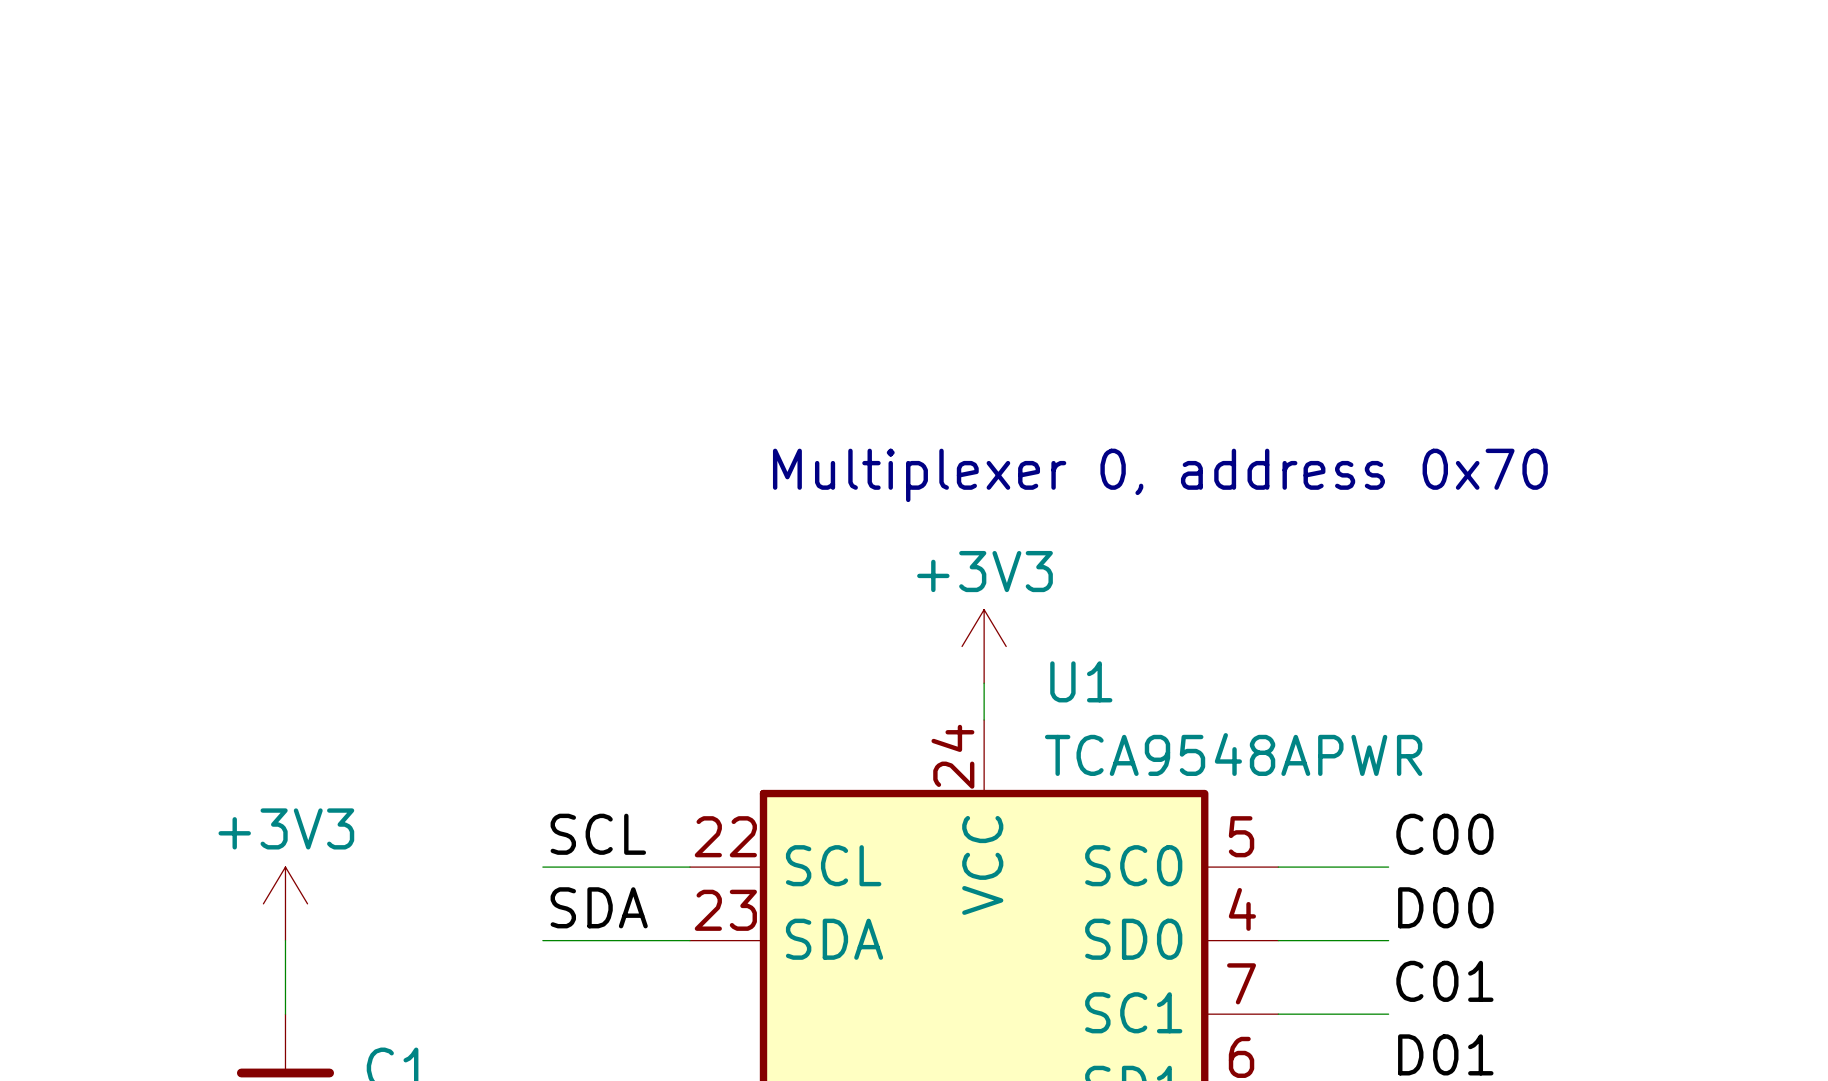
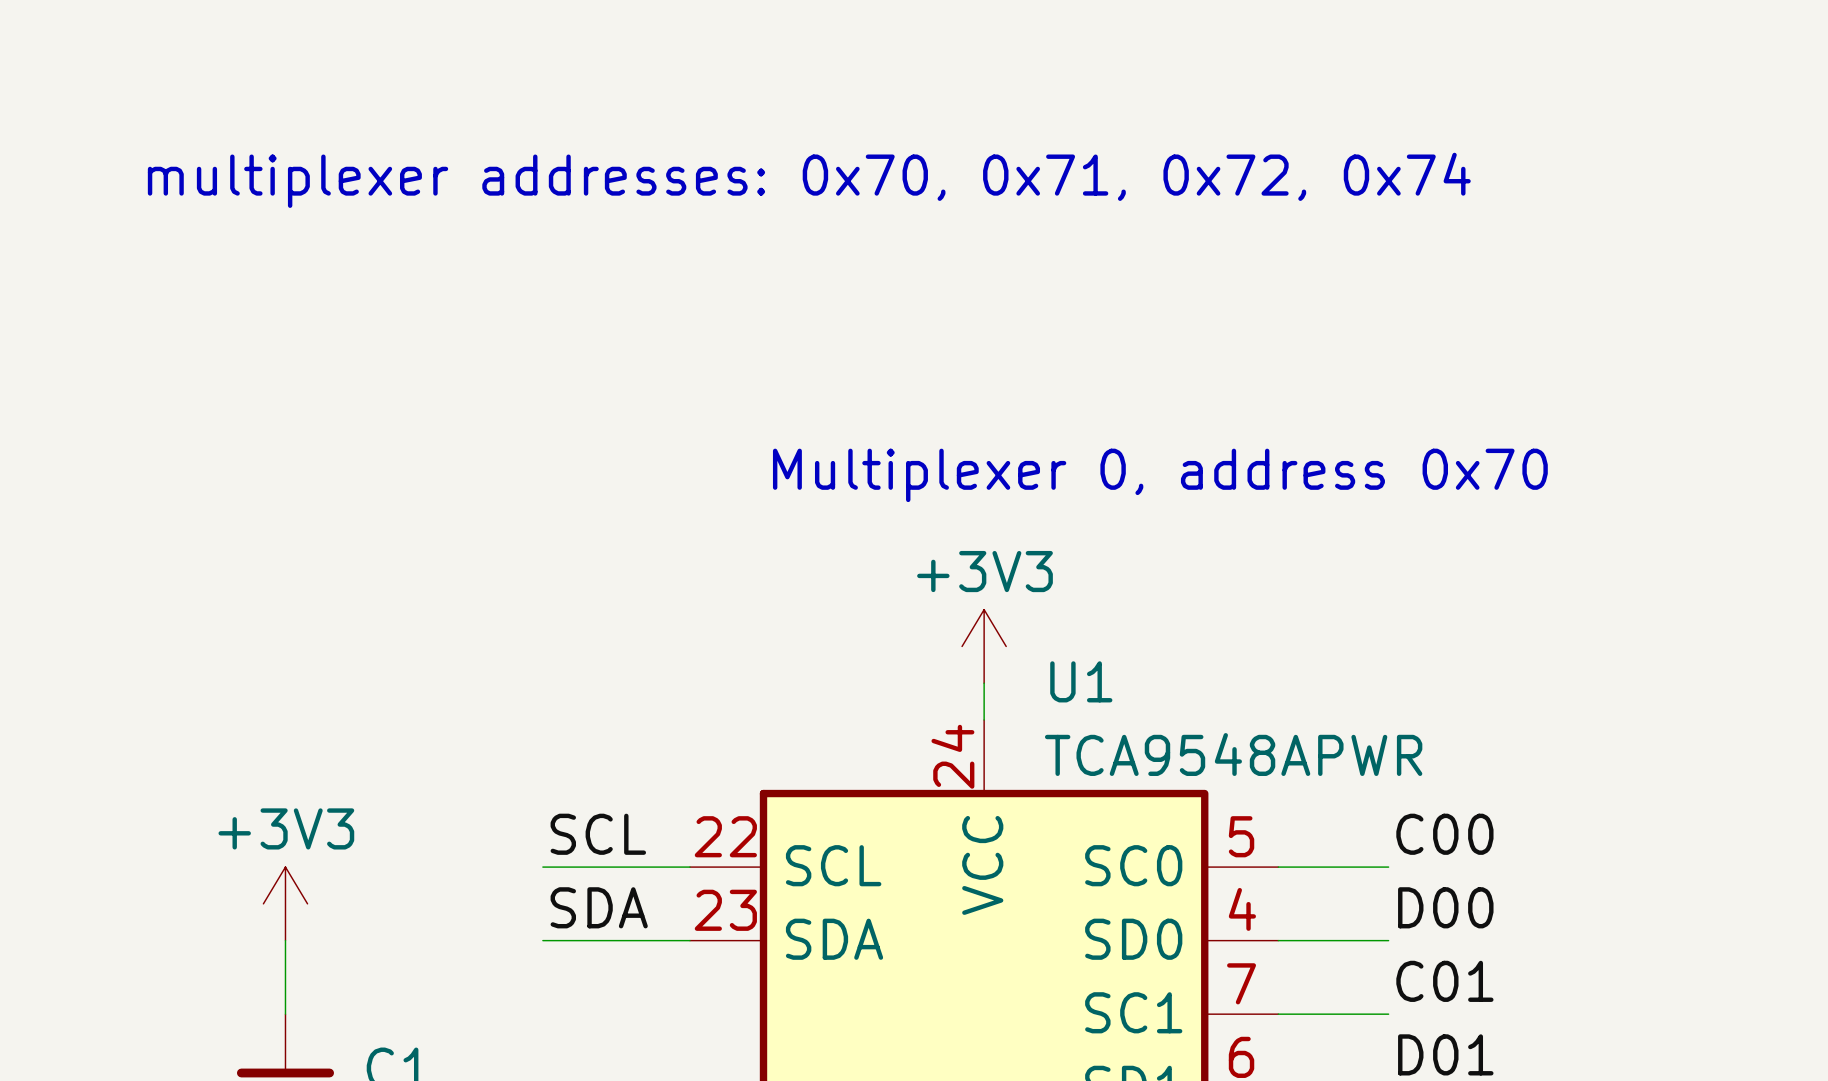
text: none -> multiplexer addresses: 0x70, 0x71, 0x72, 0x74 (809, 180)

